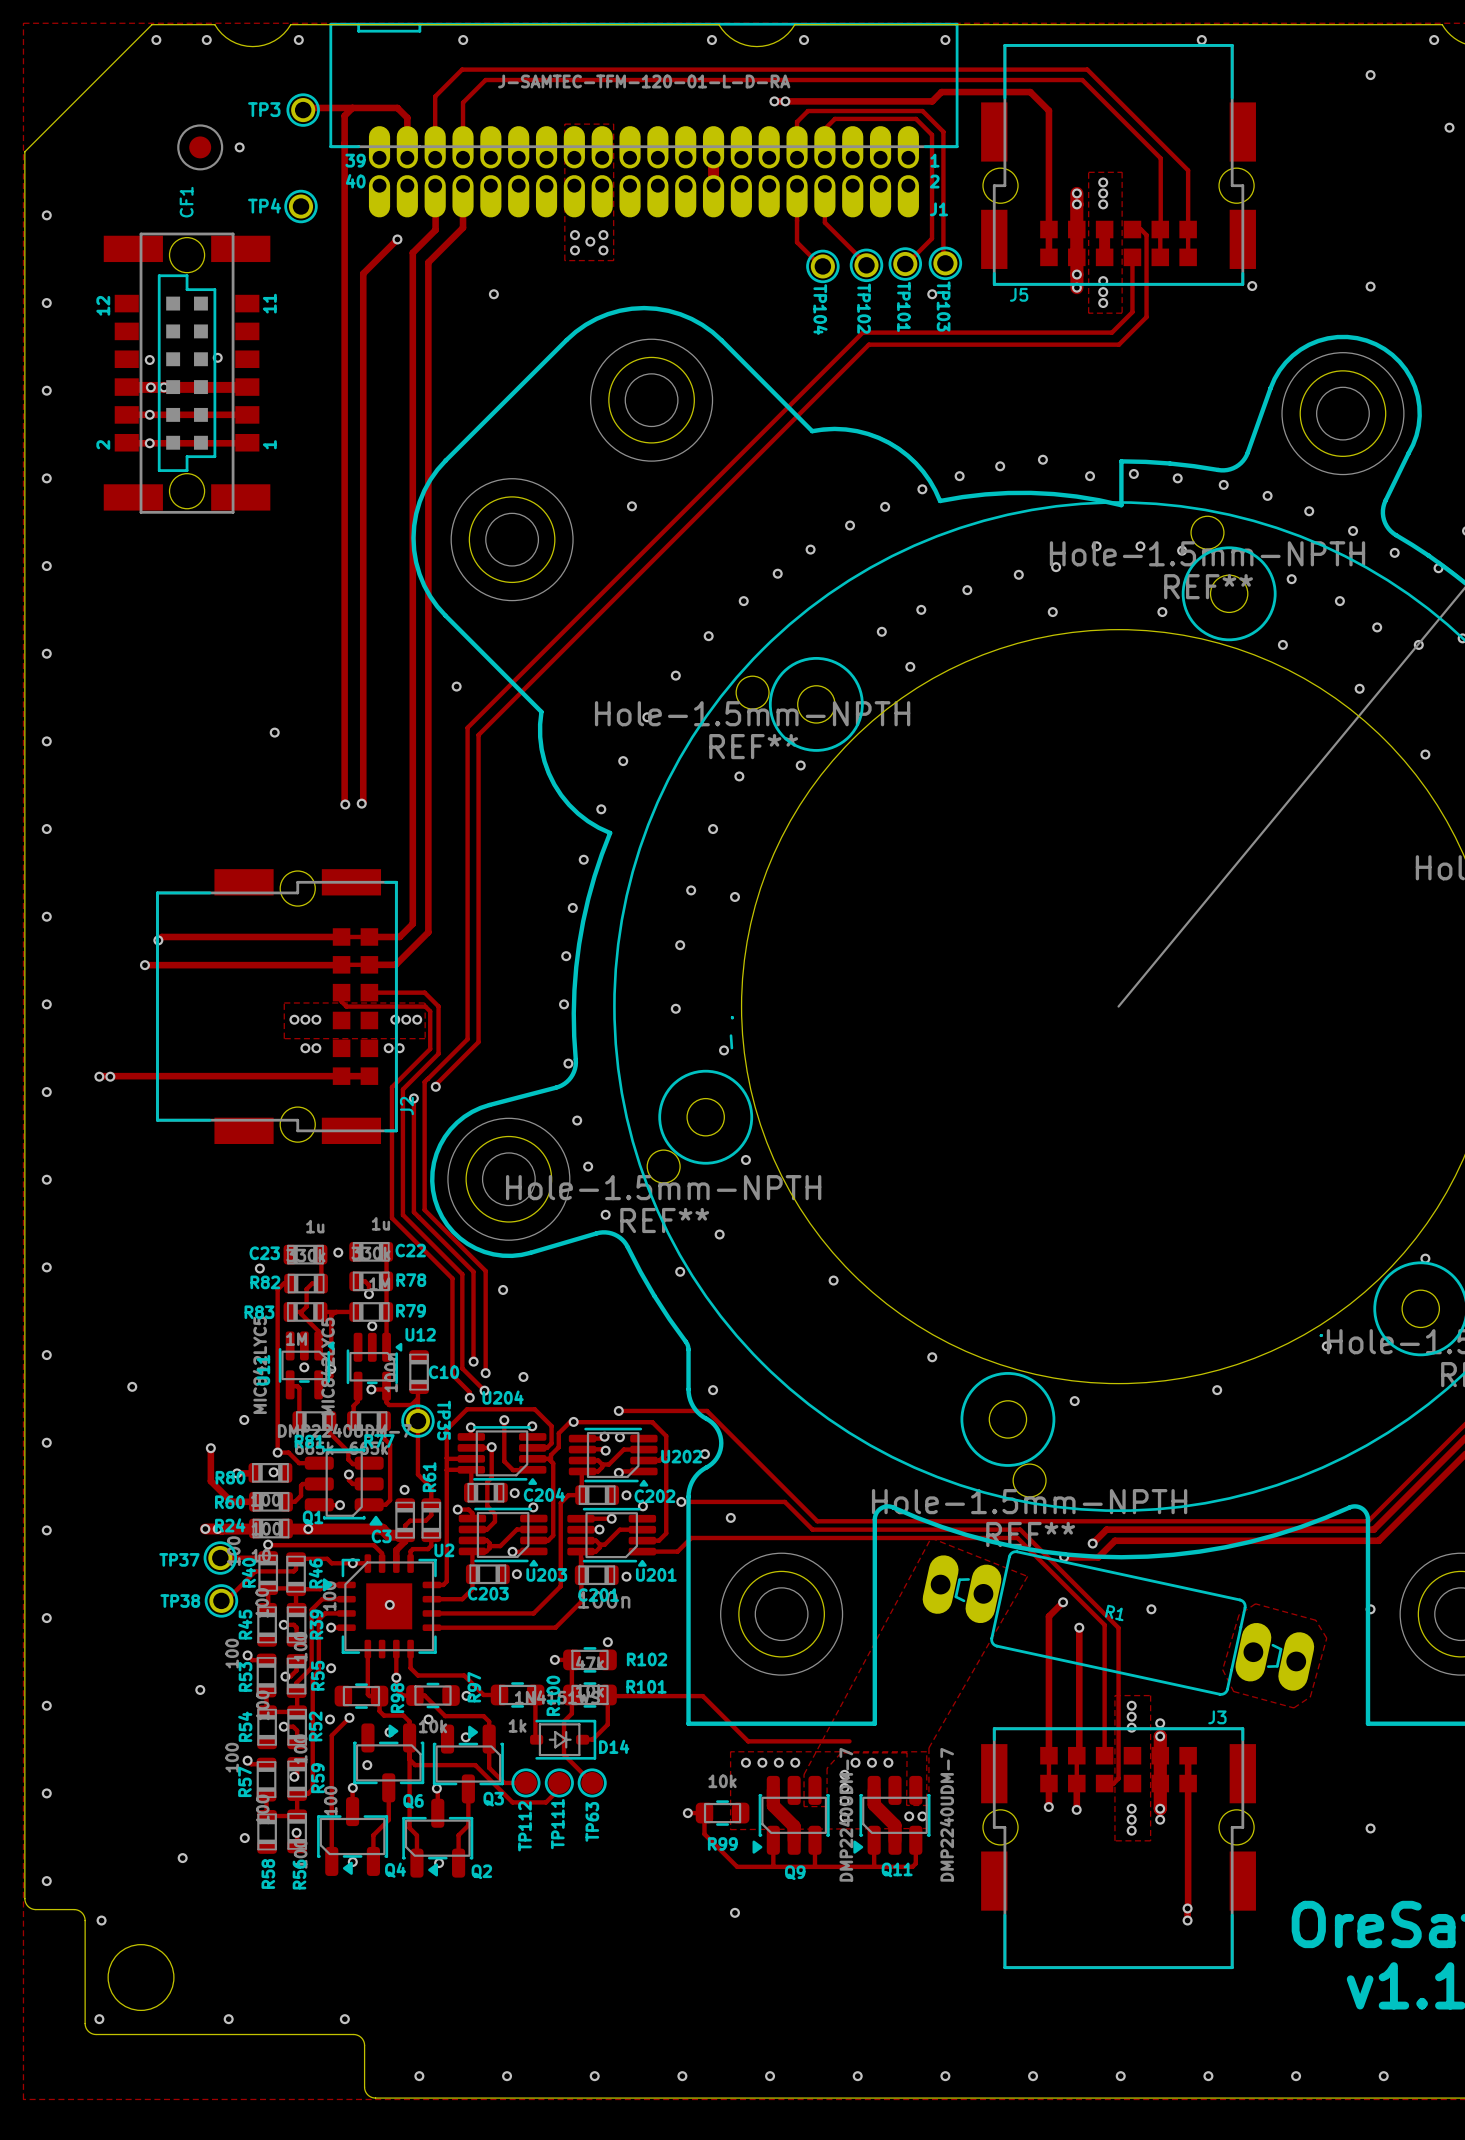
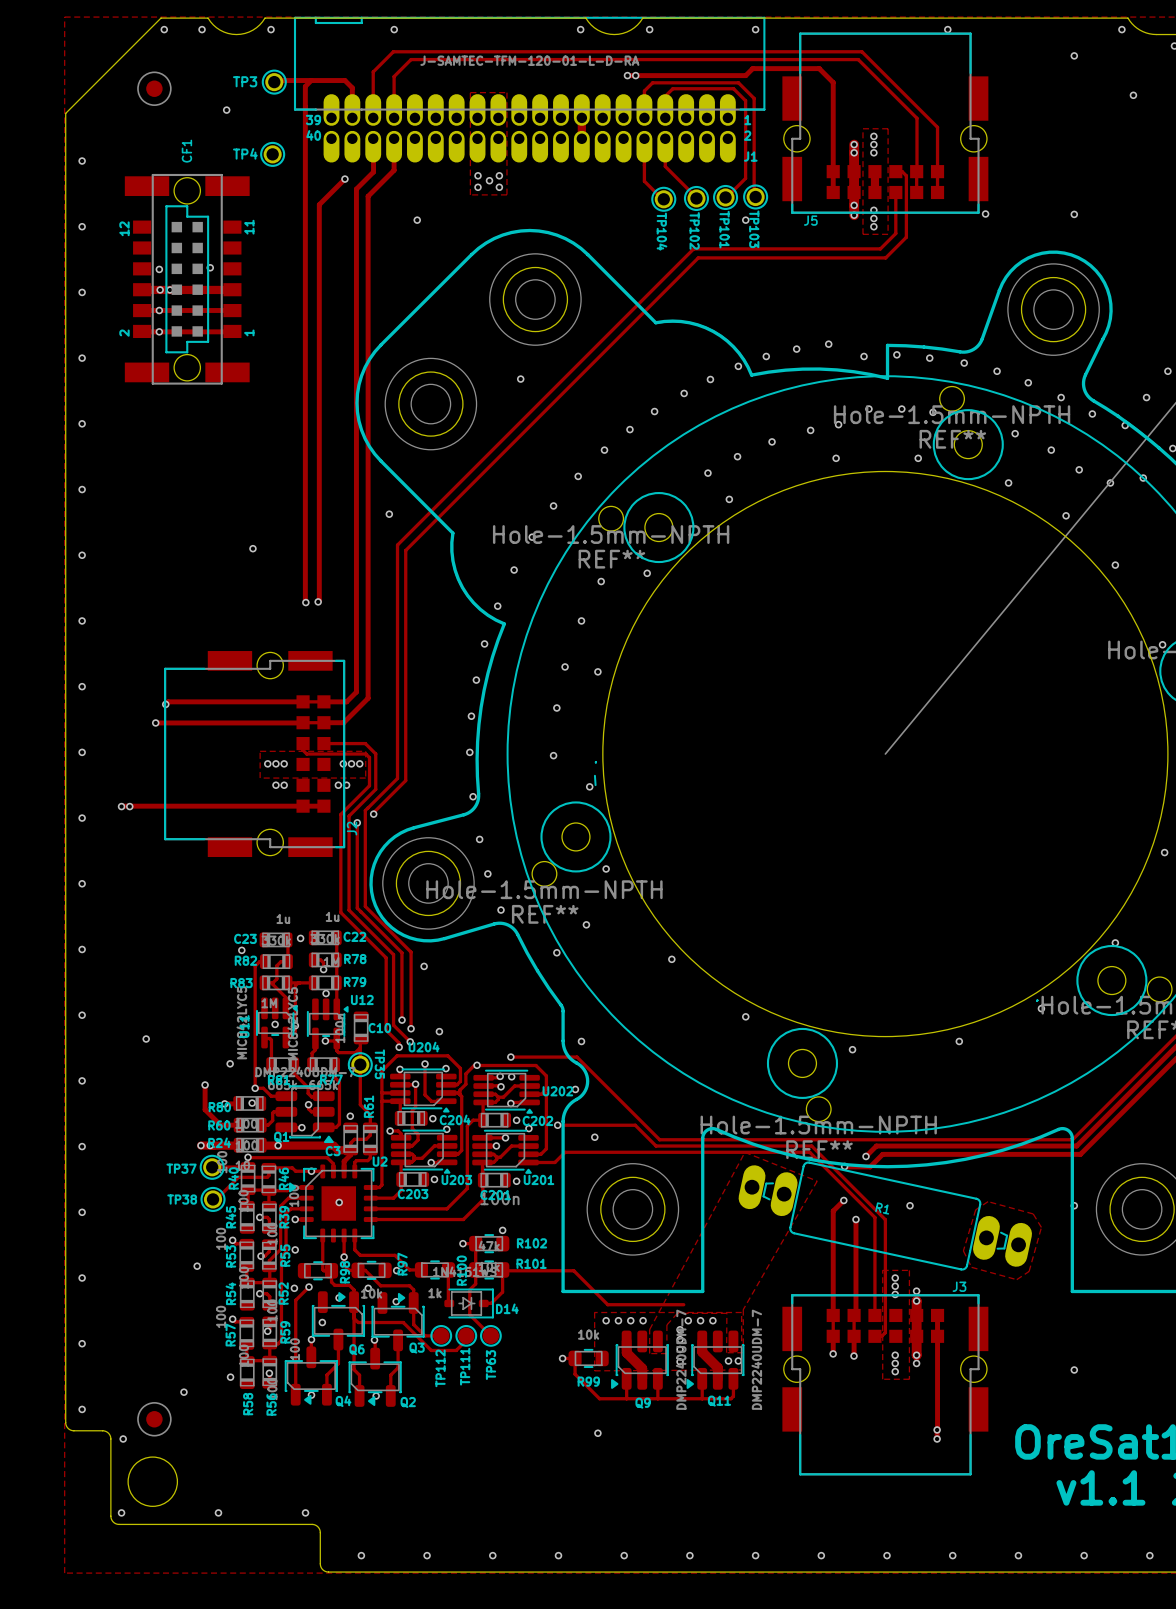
part position: (200, 147) -> (154, 88)
part: none -> (154, 1419)

